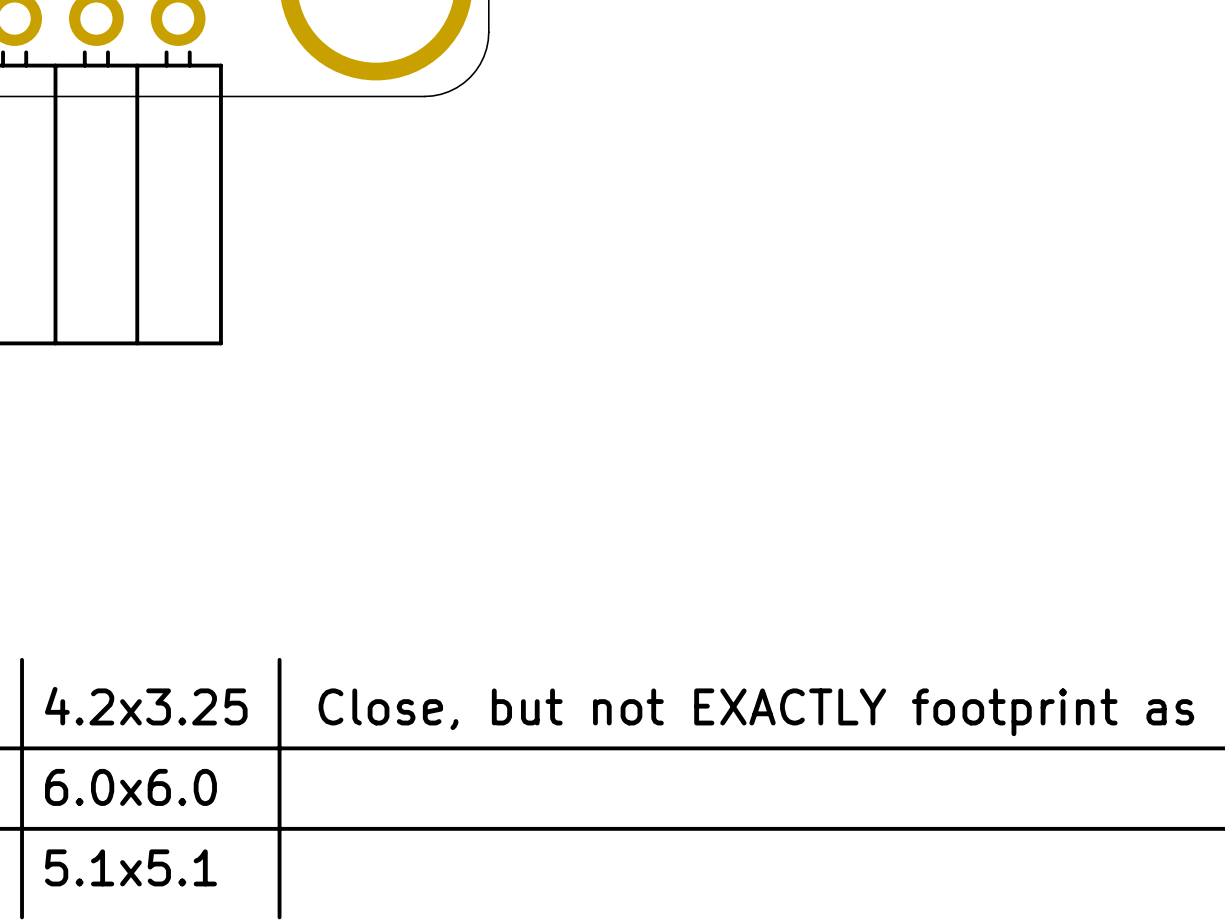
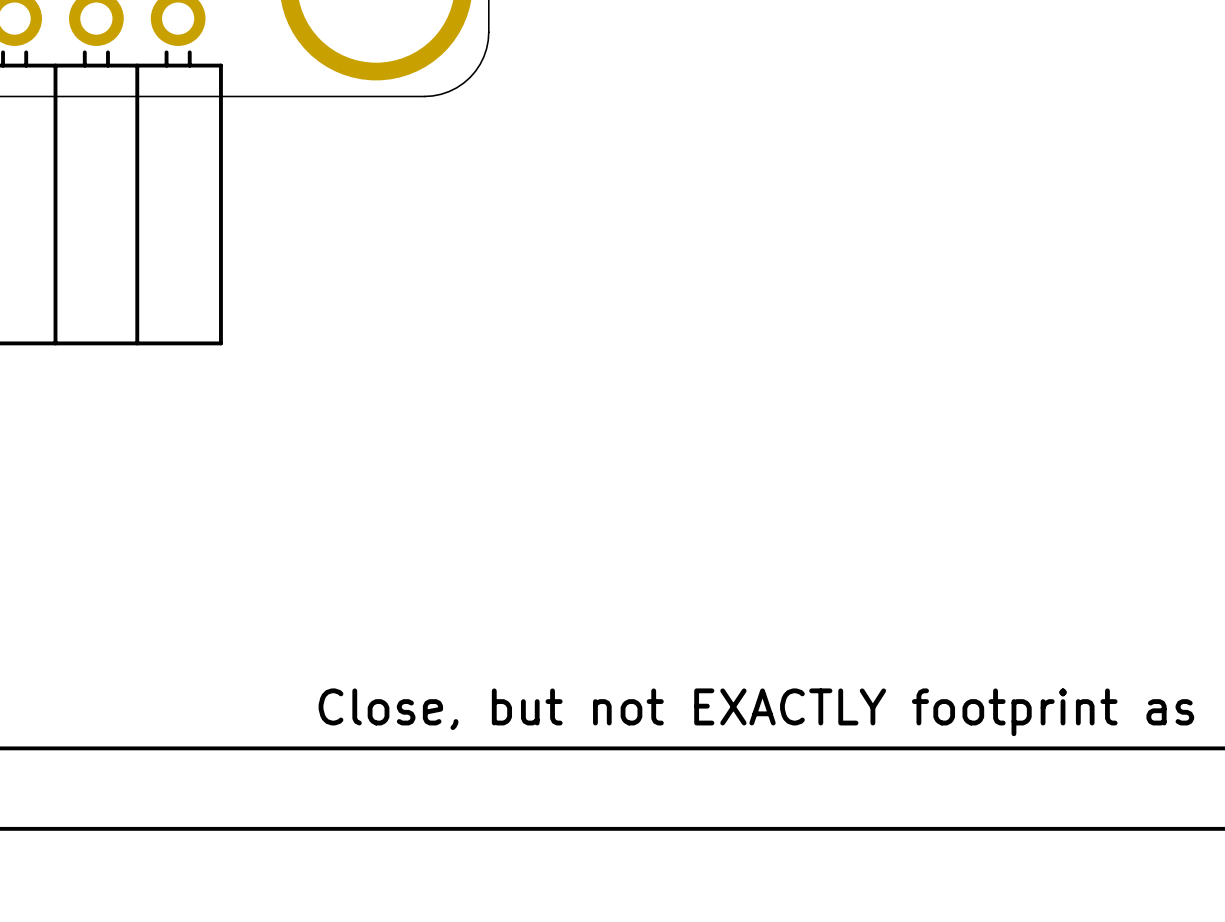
line: (22, 659) (22, 917) -> none
line: (279, 659) (279, 917) -> none
text: 4.2x3.25 (146, 706) -> none
text: 6.0x6.0 (130, 787) -> none
text: 5.1x5.1 (130, 867) -> none

